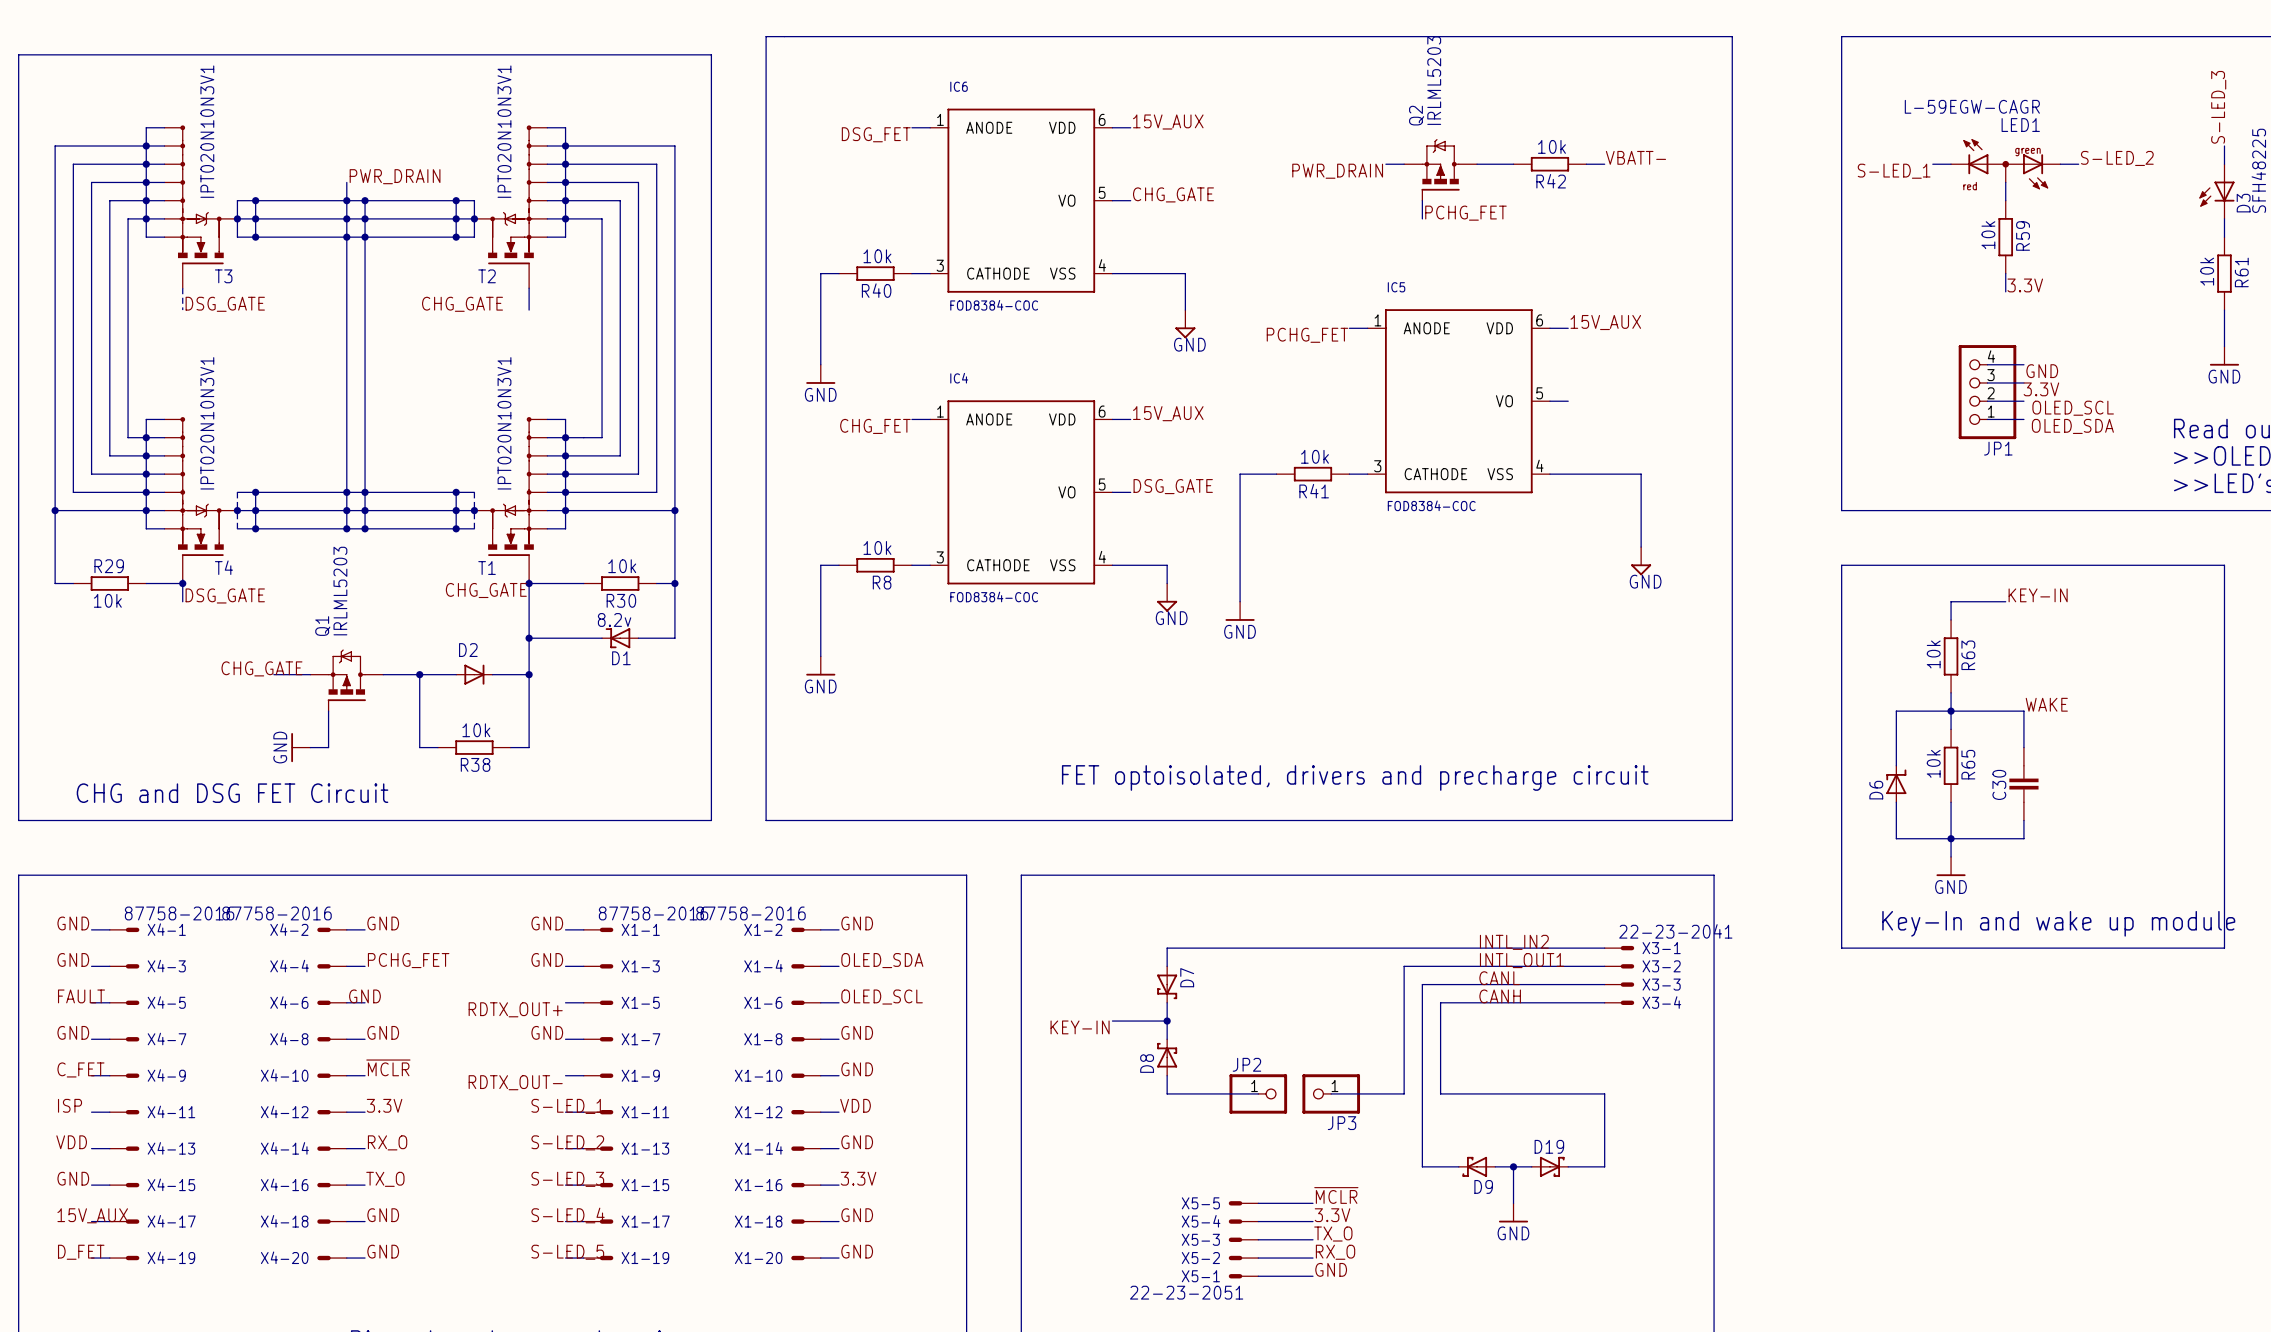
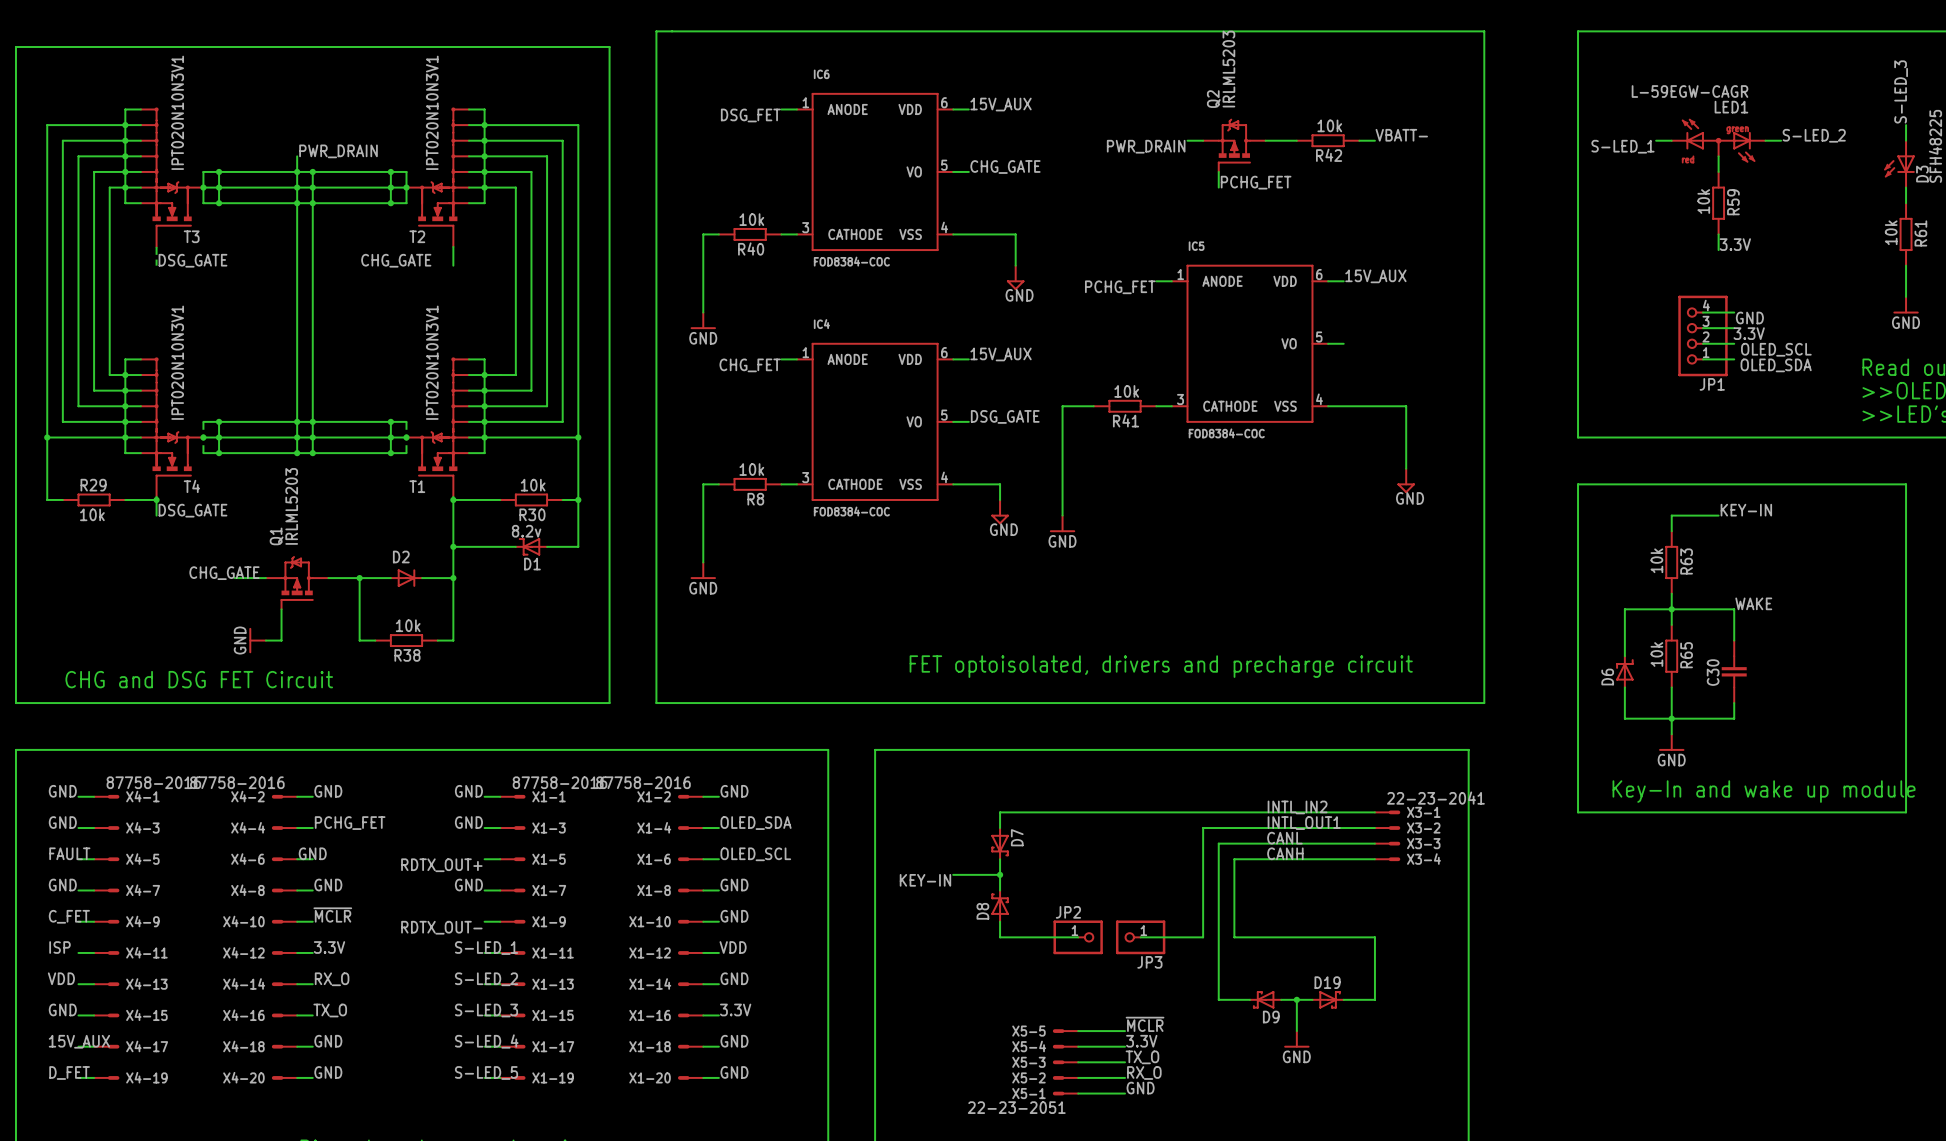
label: CHG_GATE (486, 590) -> none

